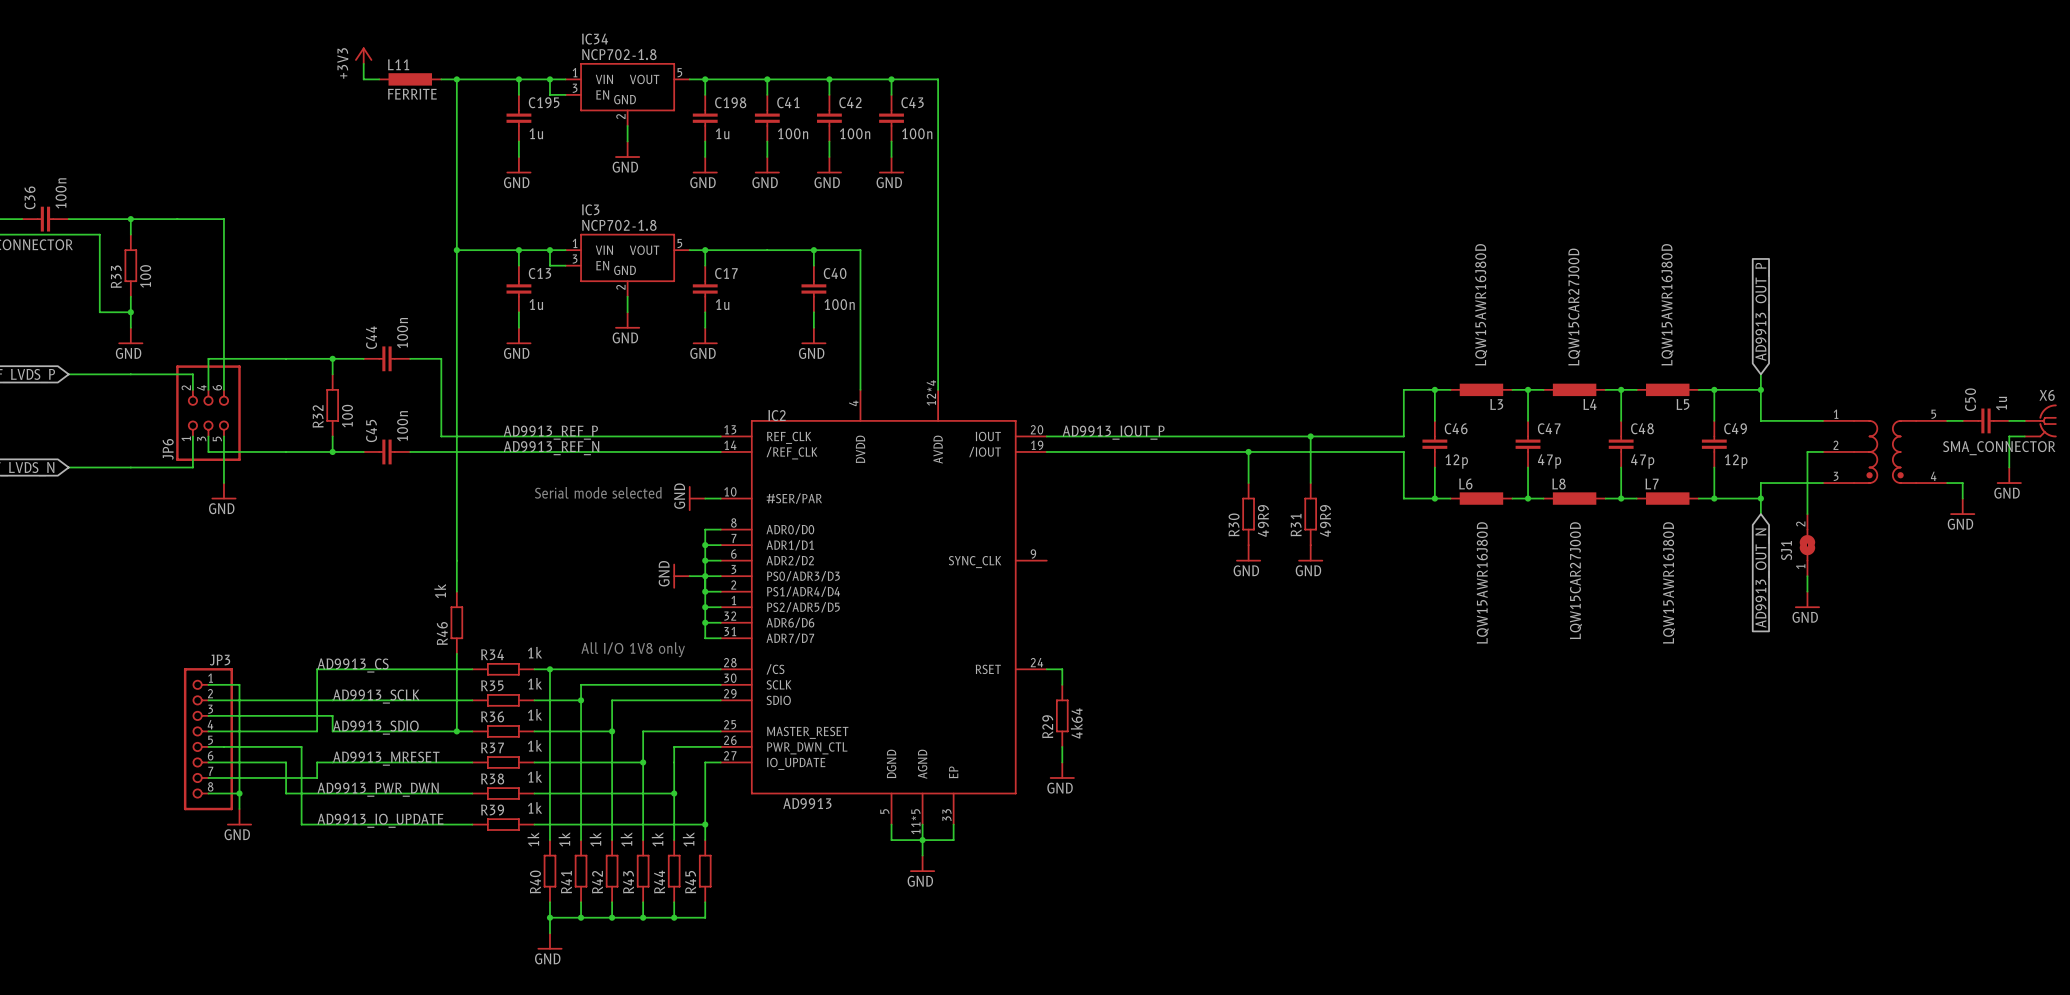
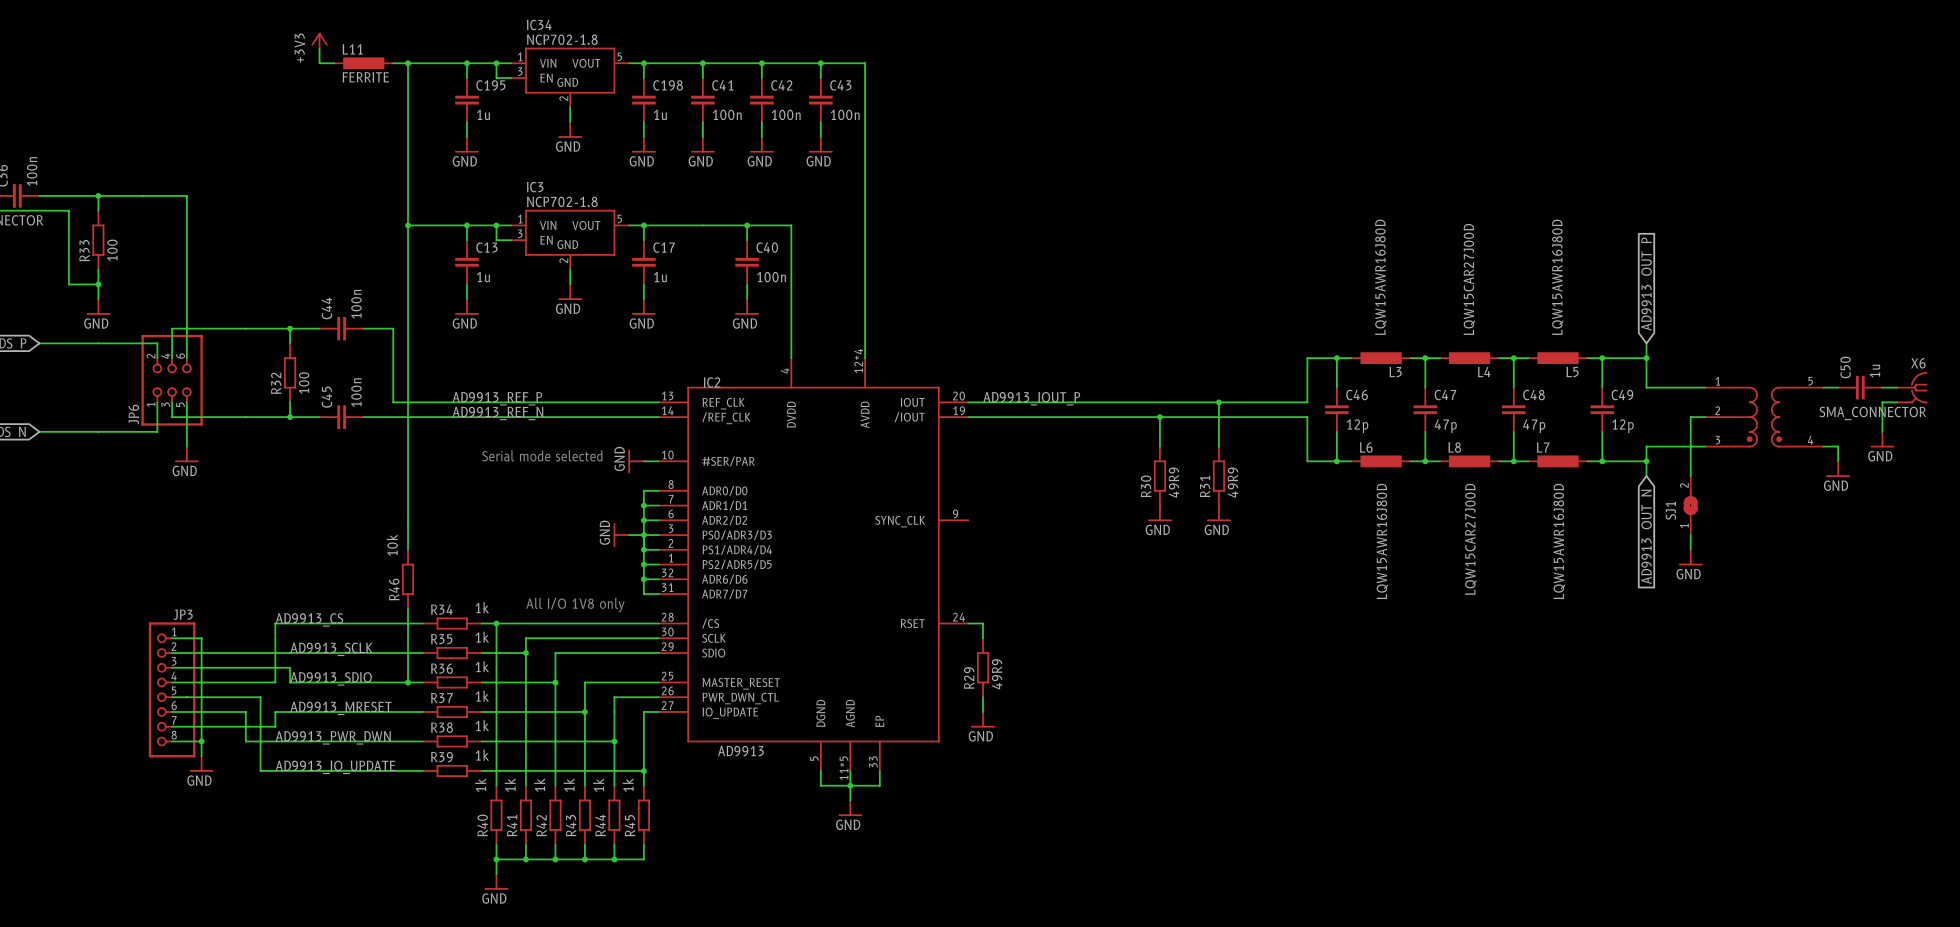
R46 value: 1k (440, 591) -> 10k (392, 545)
R29 value: 4k64 (1076, 723) -> 49R9 (997, 674)

